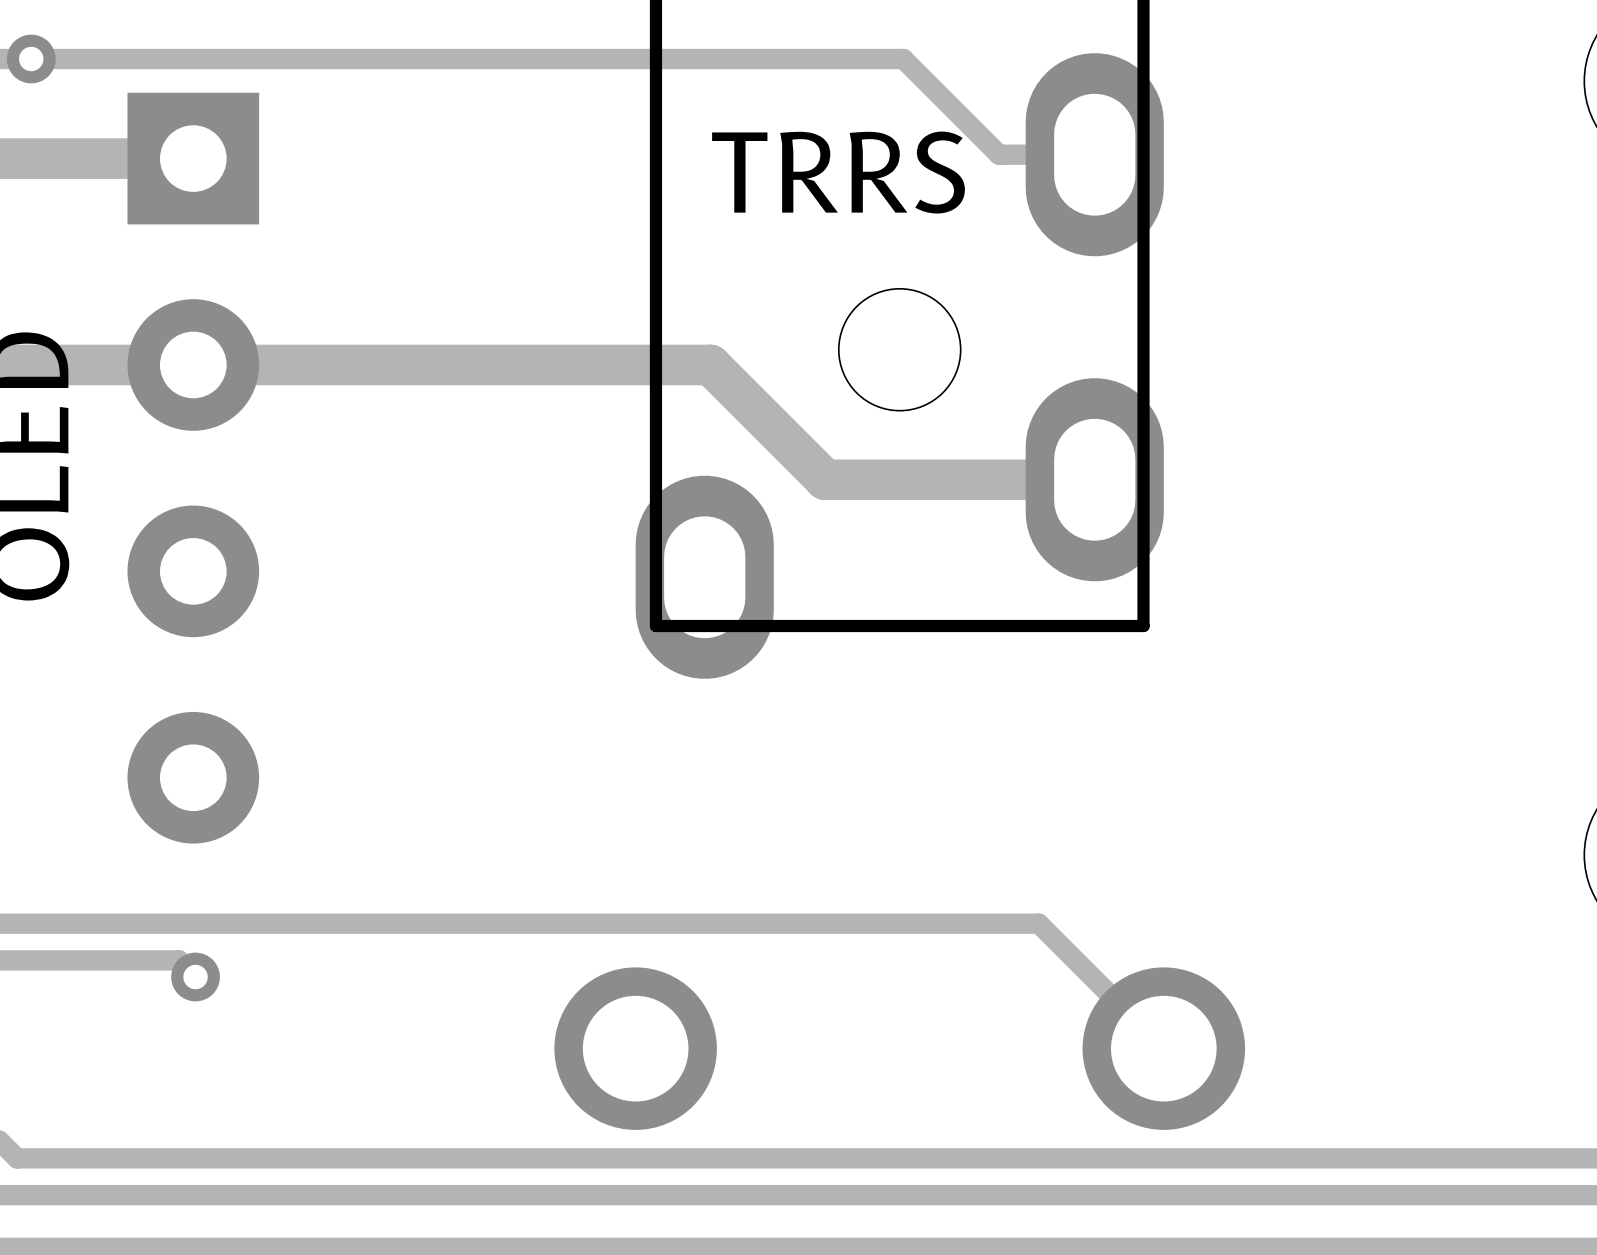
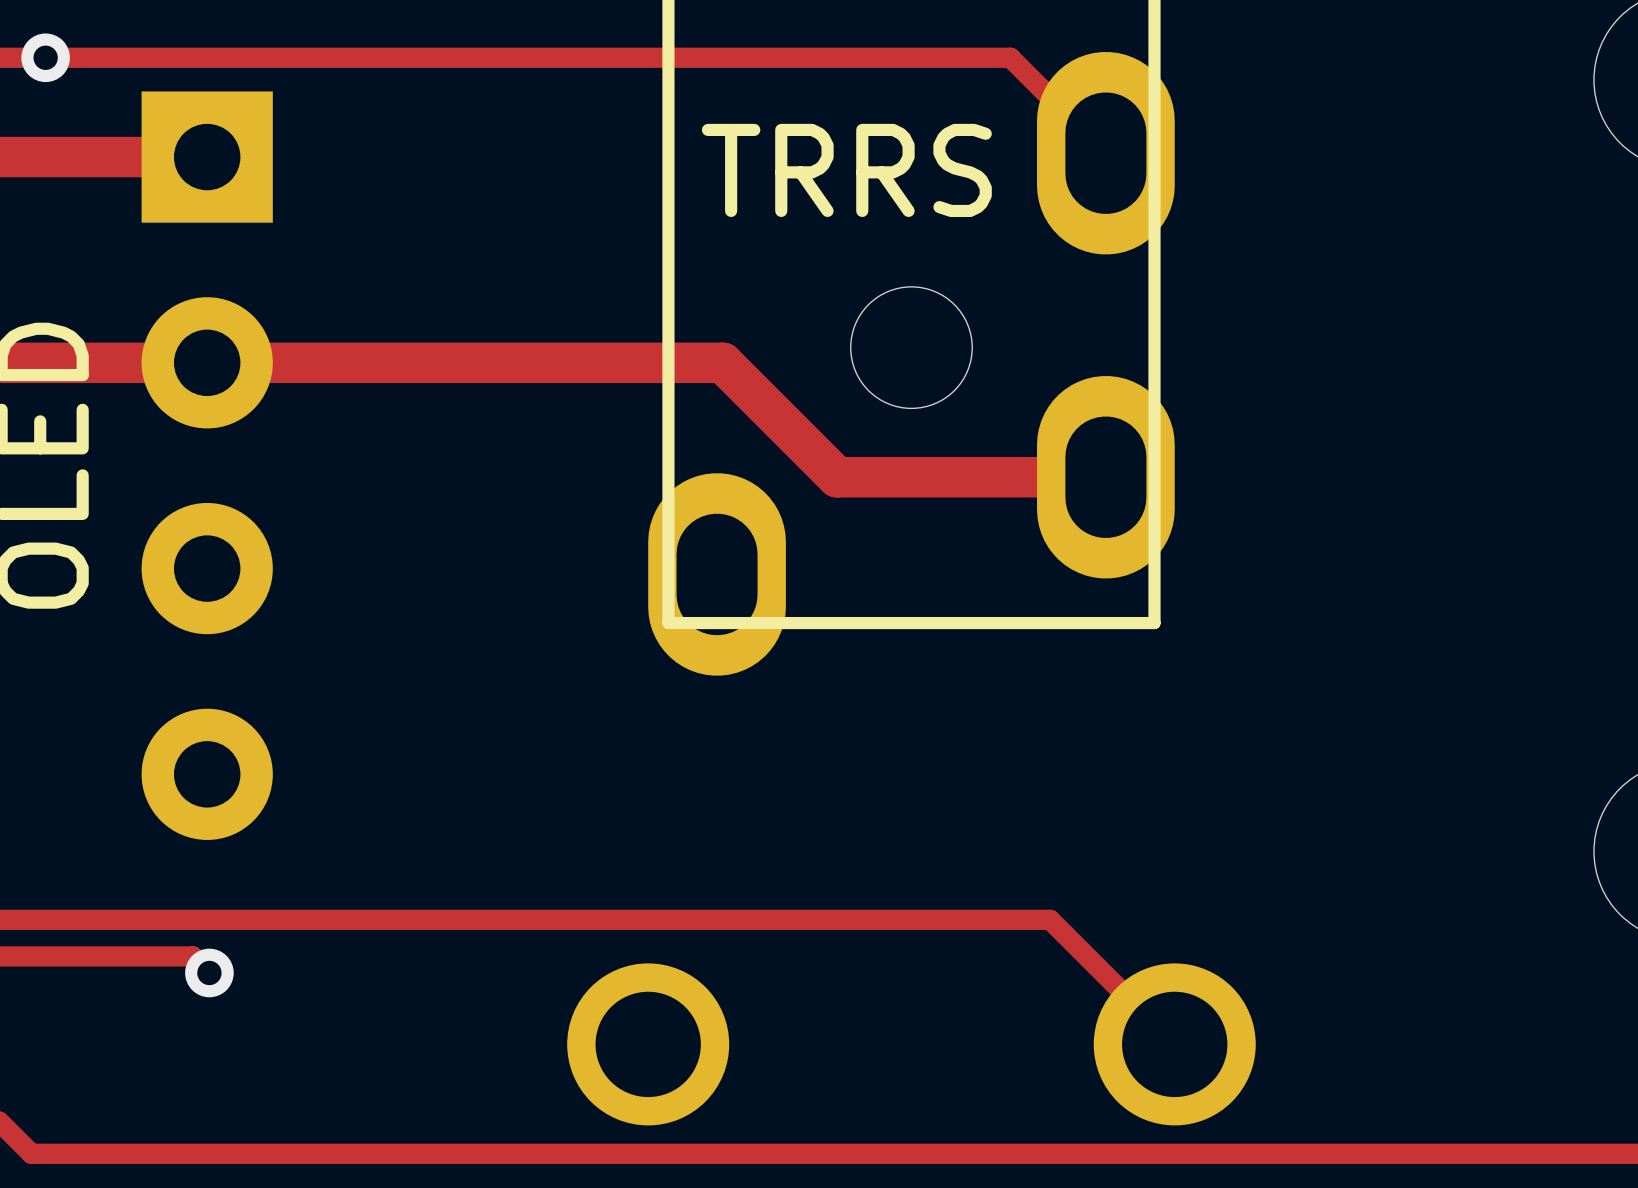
track: (903, 58) (999, 154) (1094, 154) -> (915, 57) (1010, 57) (1105, 153)

